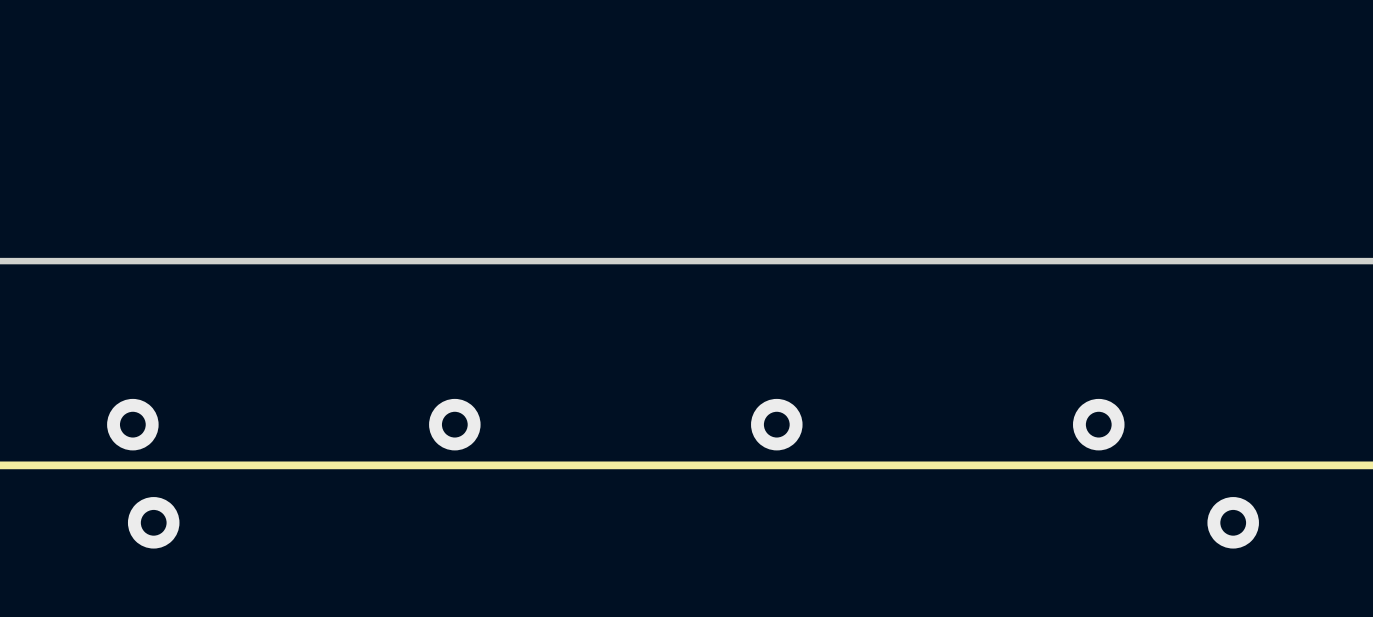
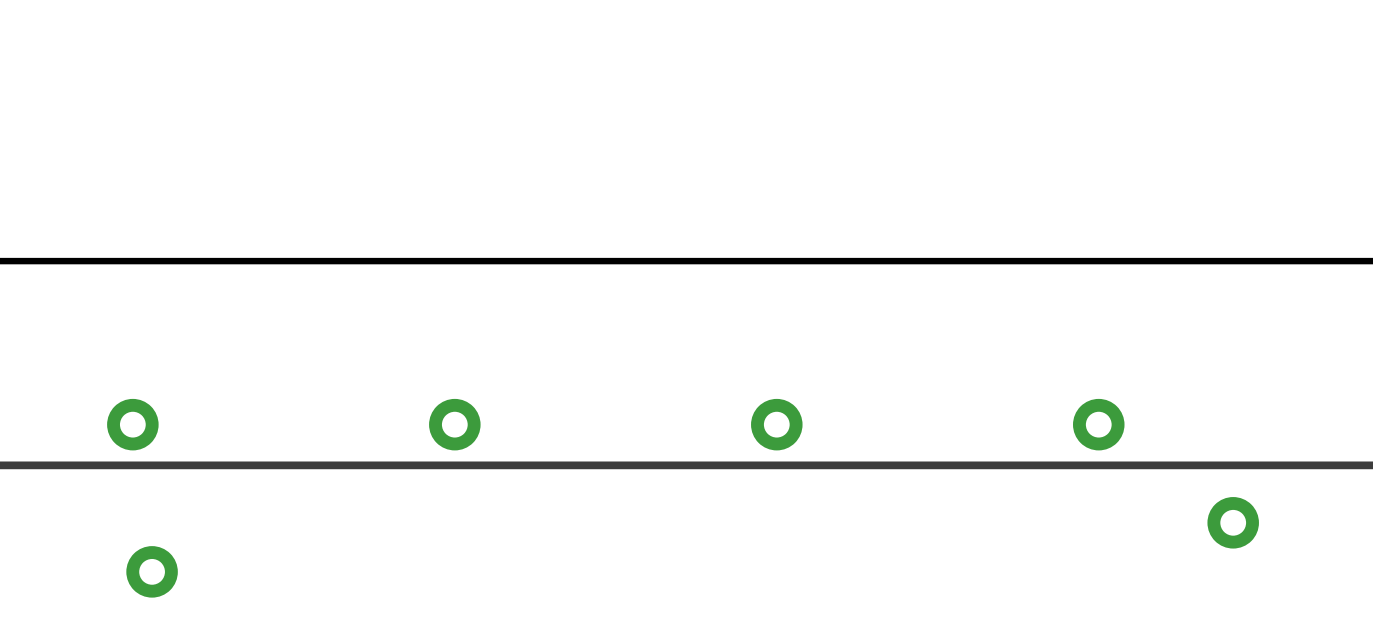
via position: (153, 522) -> (152, 571)

